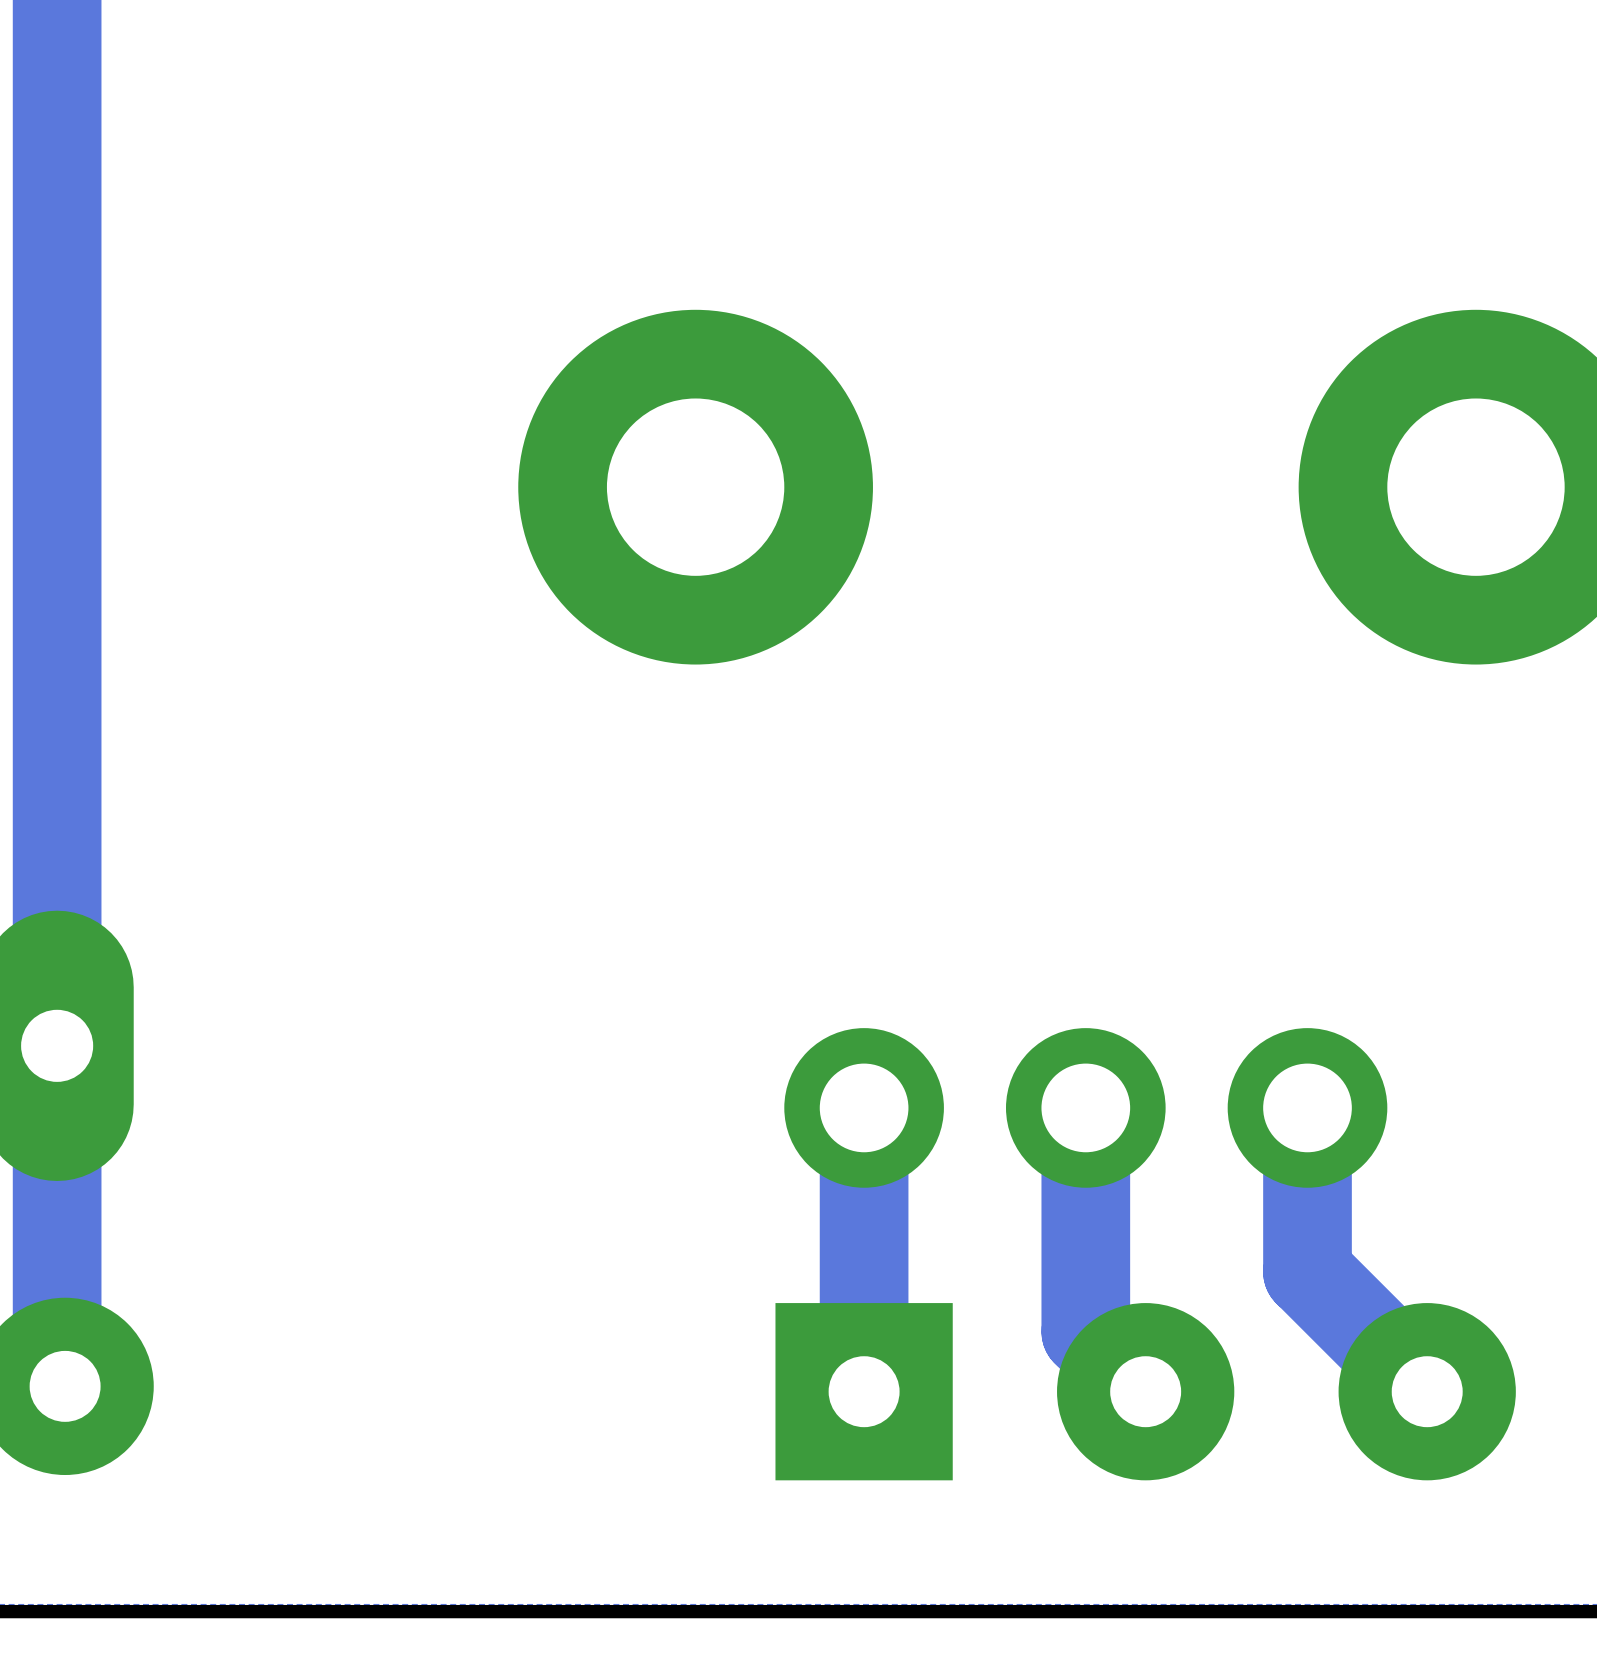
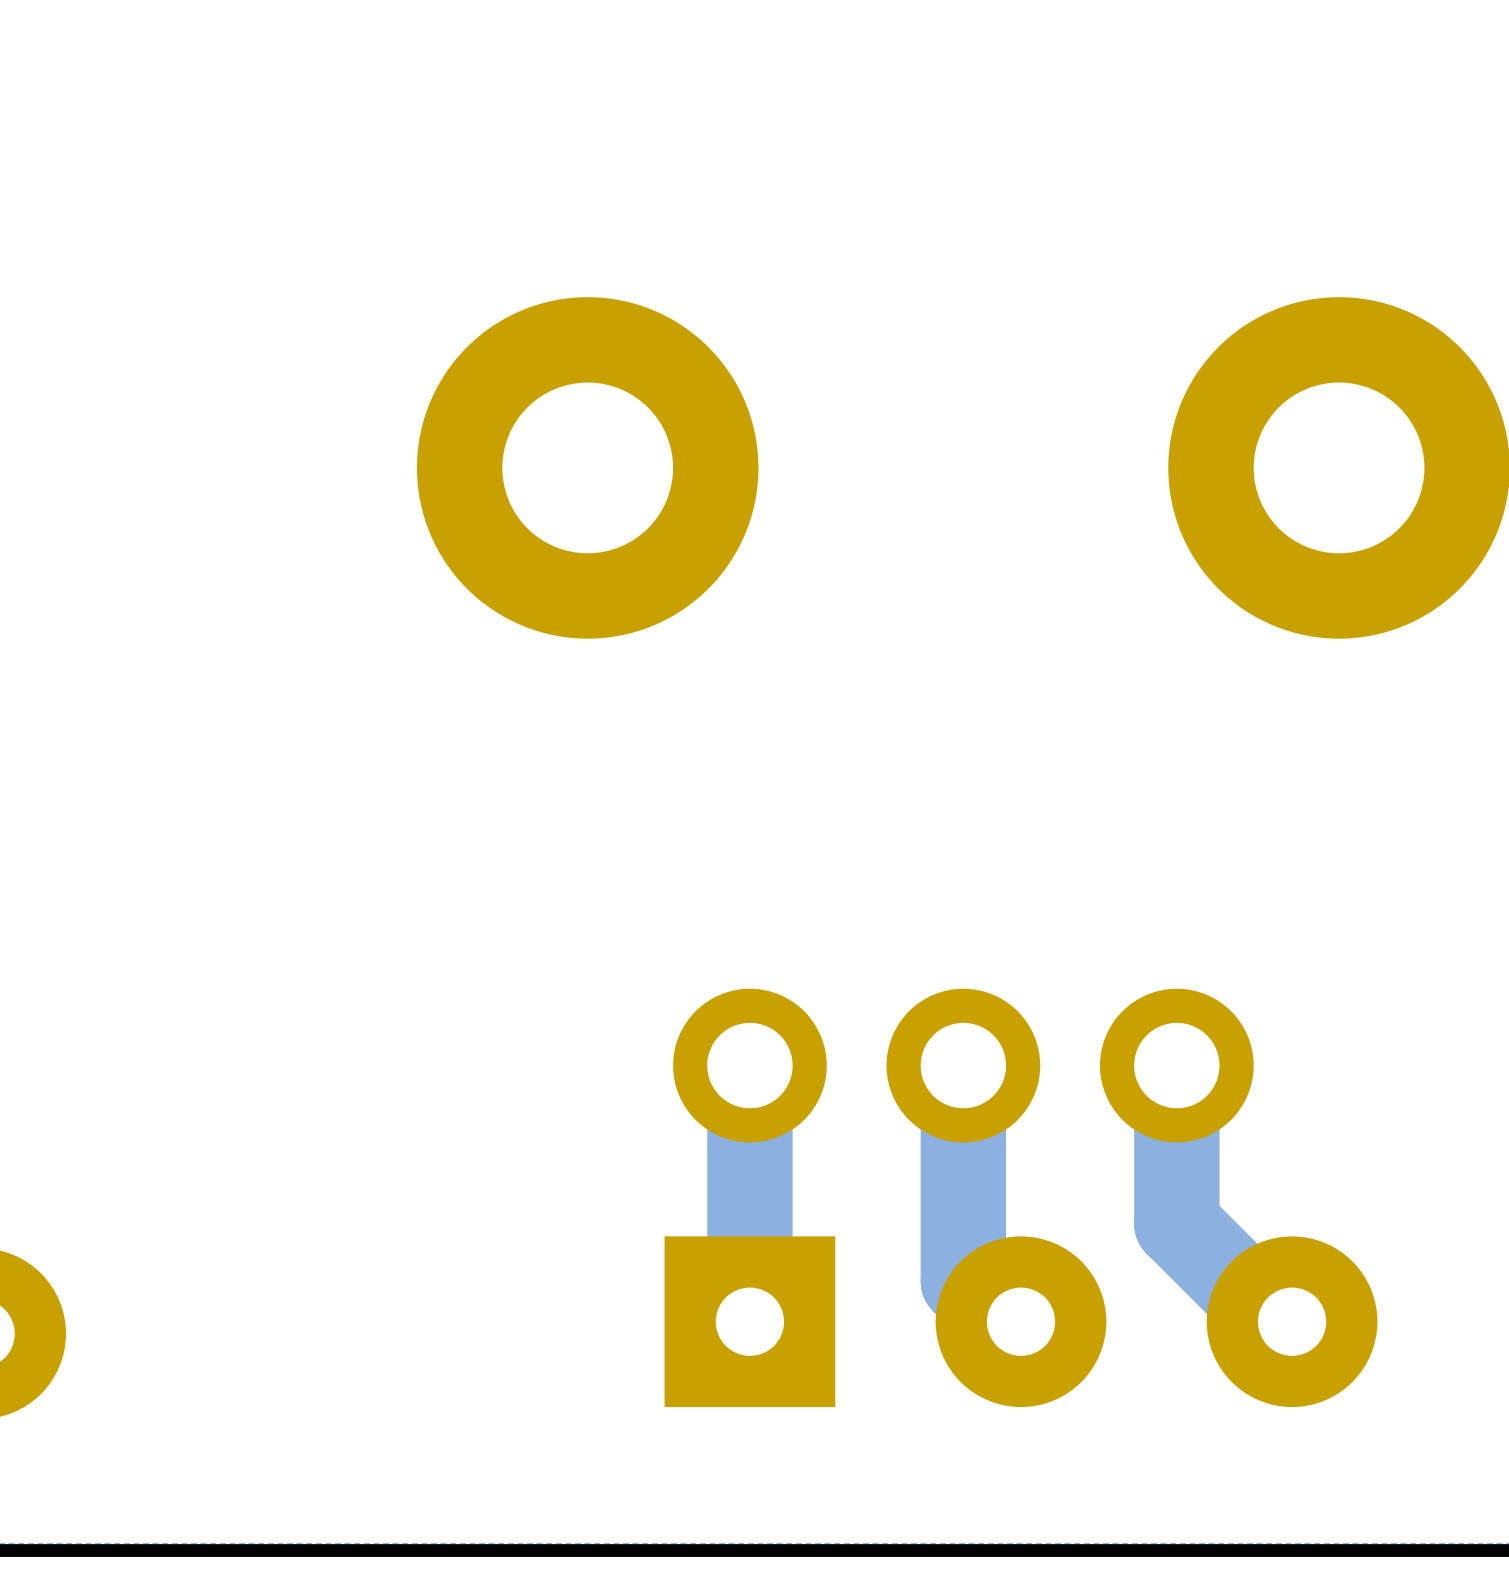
part position: (1145, 1391) -> (1021, 1321)

